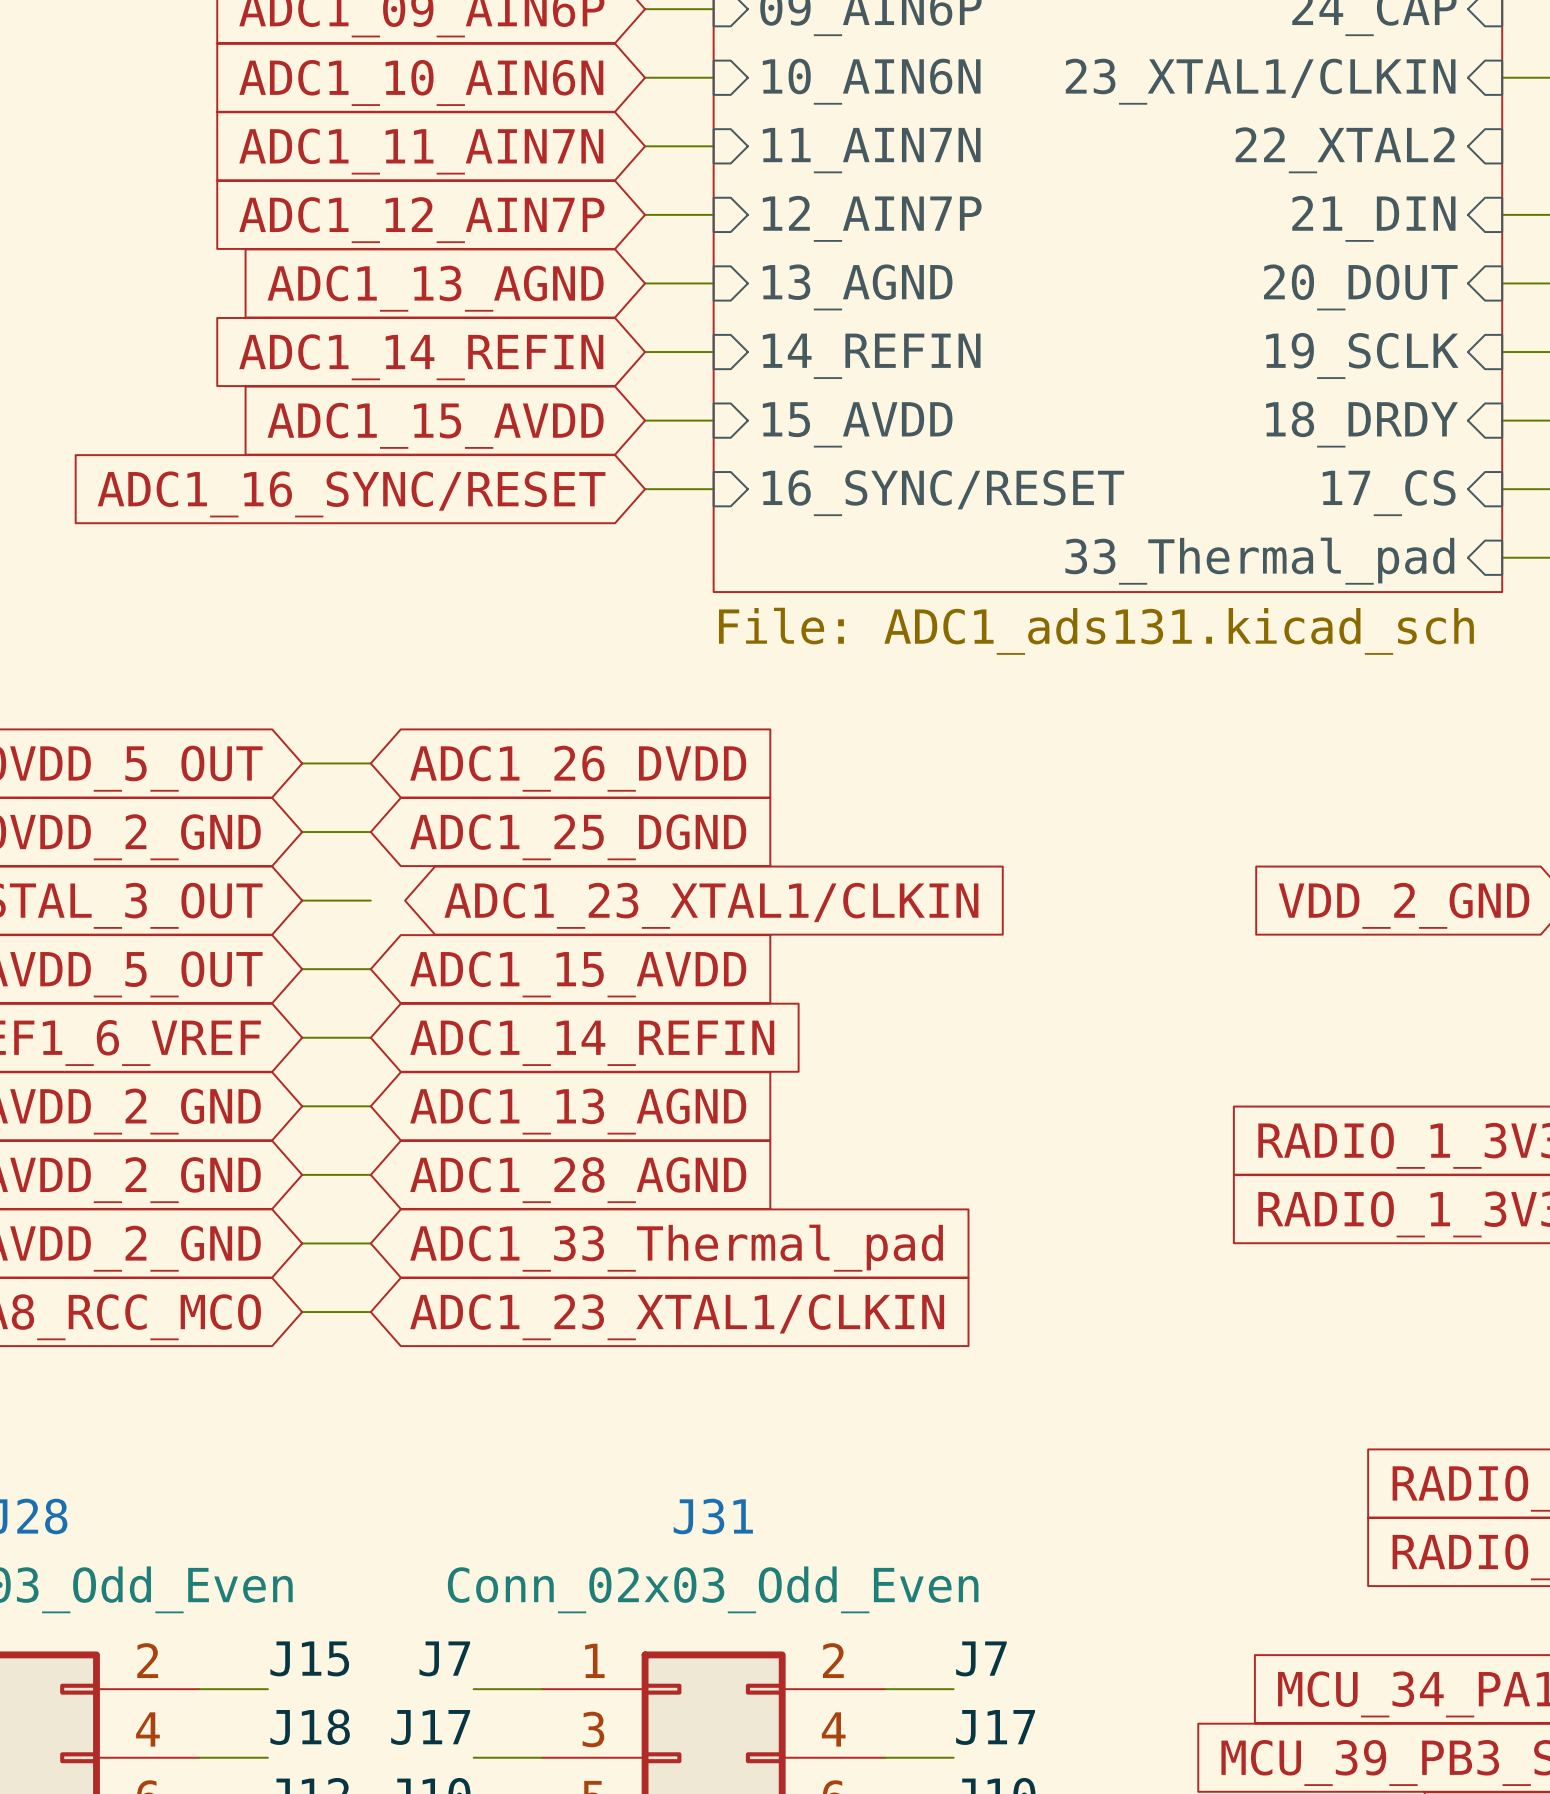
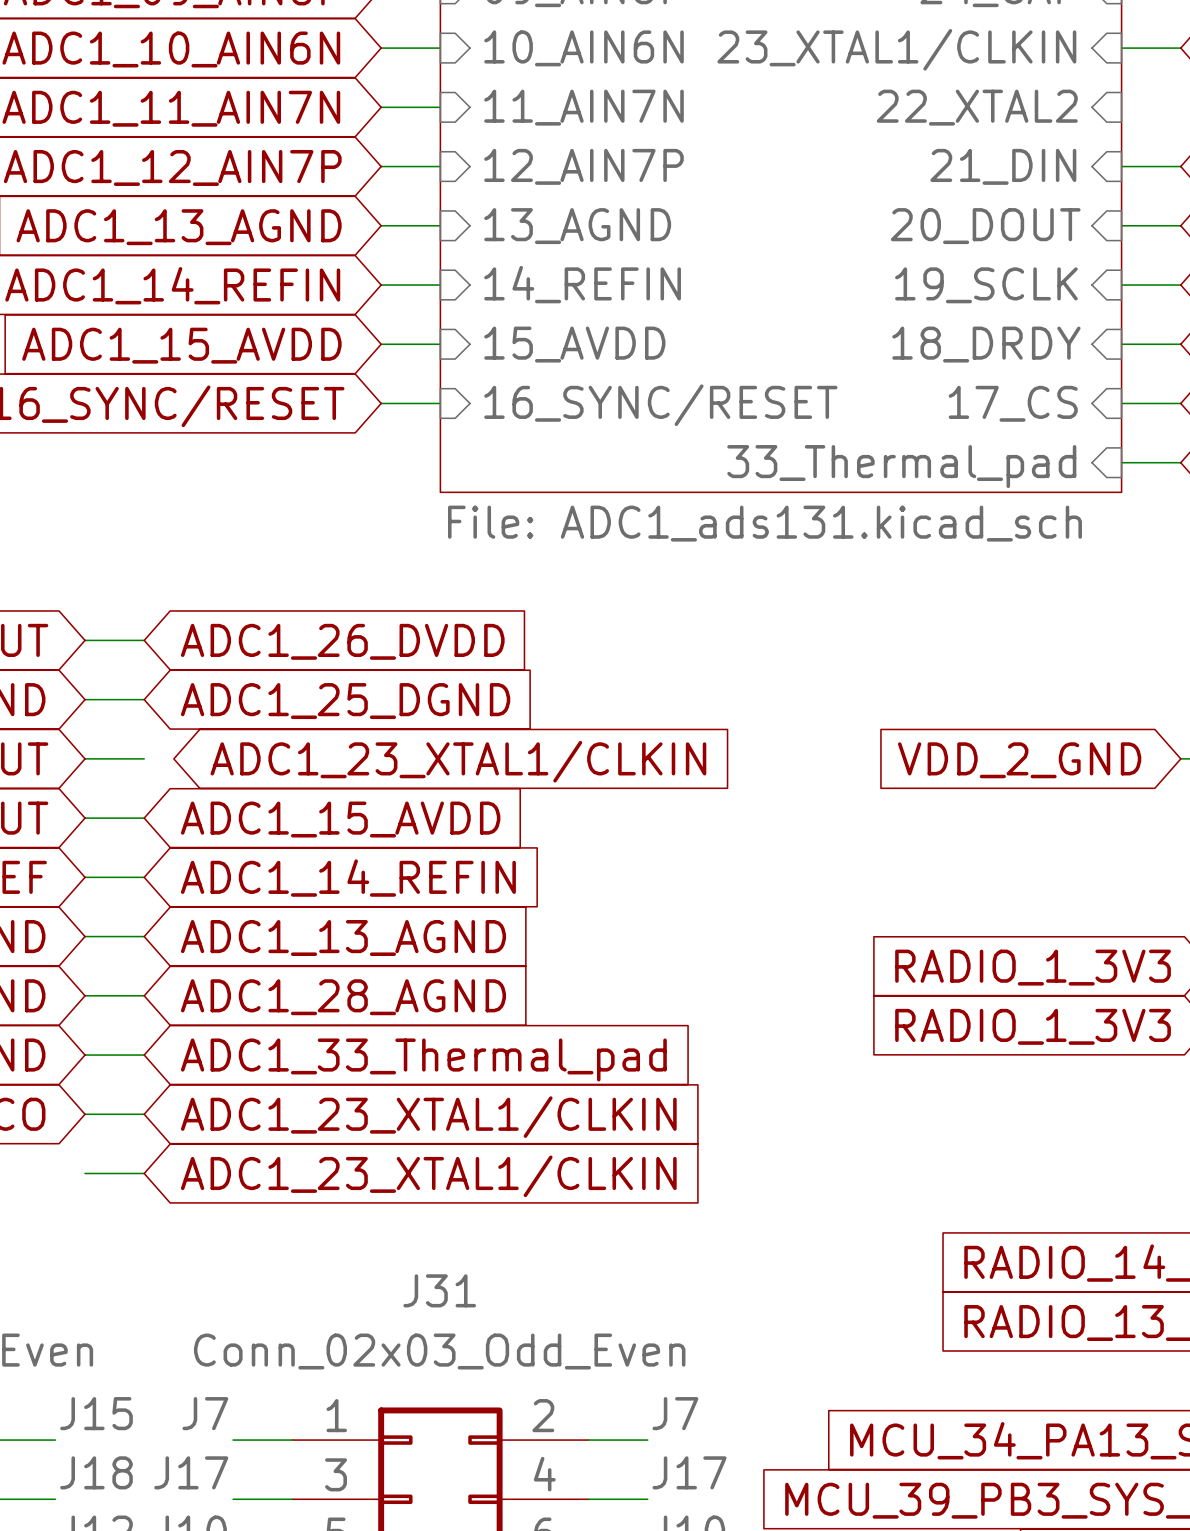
wire: none -> (85, 1173) (144, 1173)
global label: none -> ADC1_23_XTAL1/CLKIN (428, 1176)

